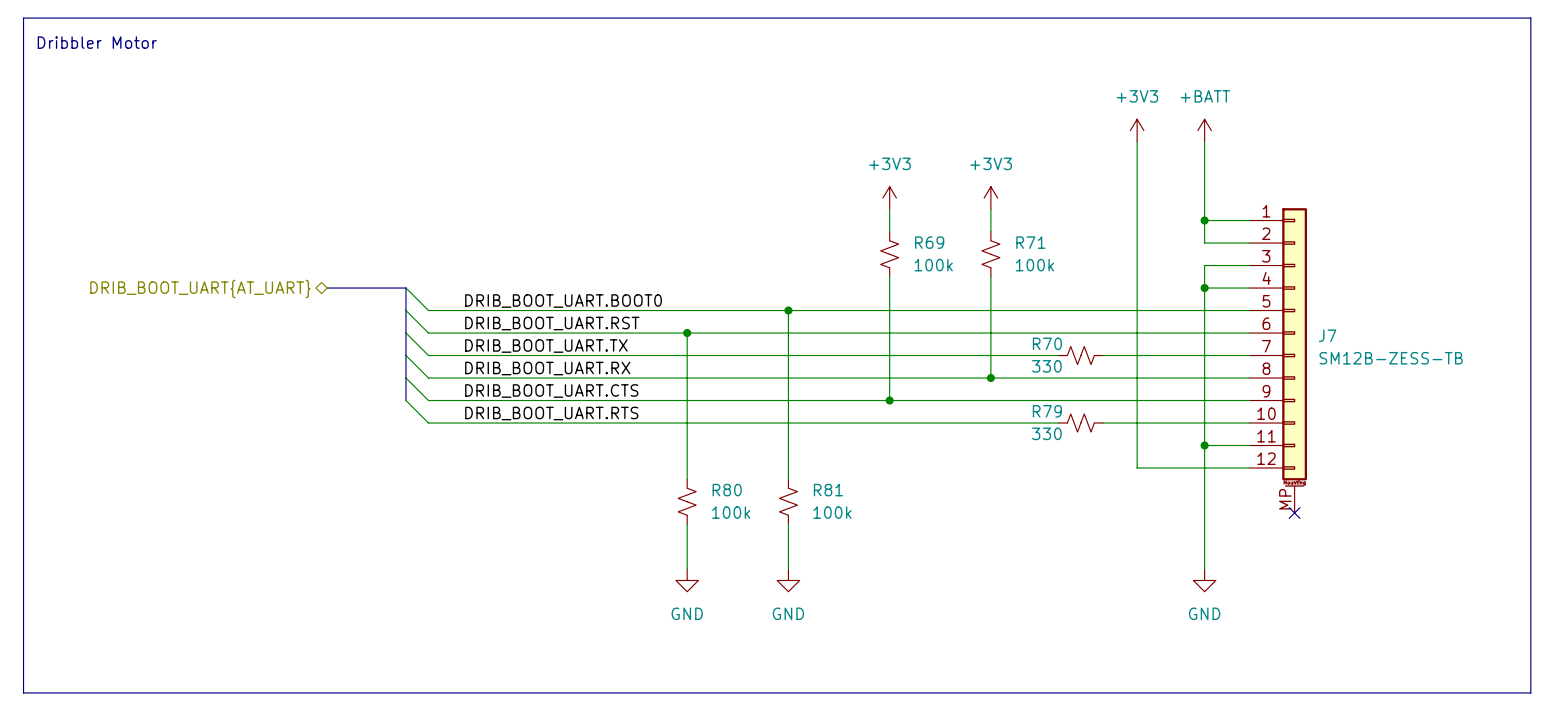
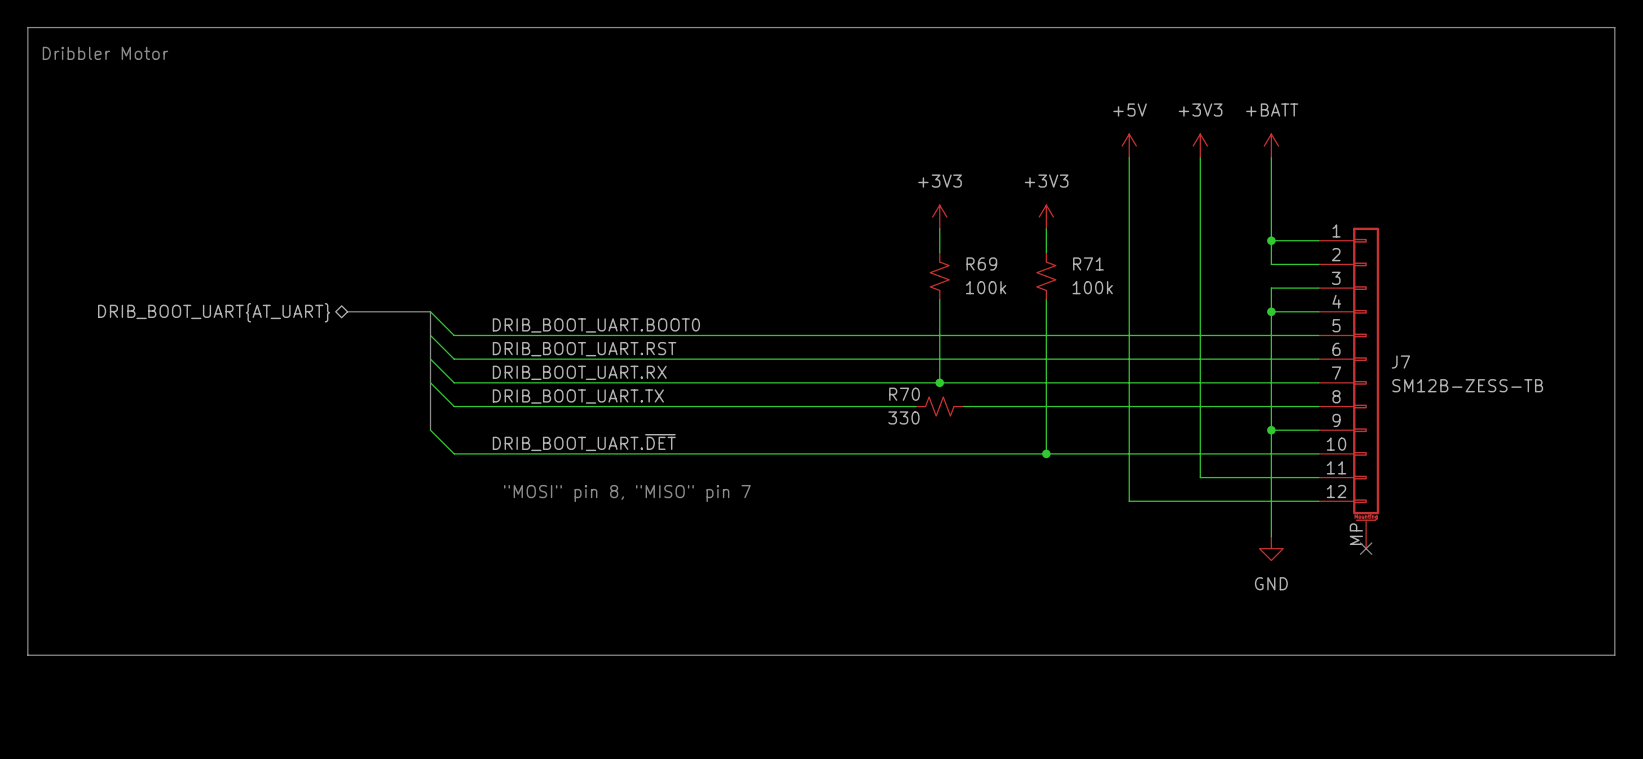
power symbol: none -> +5V (1129, 145)
wire: none -> (1129, 157) (1129, 501) (1200, 501)
wire: (788, 310) (788, 479) -> none
junction: (788, 310) -> none
wire: (687, 333) (687, 479) -> none
junction: (687, 333) -> none
label: DRIB_BOOT_UART.TX (546, 346) -> DRIB_BOOT_UART.RX (579, 372)
wire: (889, 355) (889, 400) -> (1046, 406) (1046, 453)
R70 position: (1080, 355) -> (939, 406)
label: DRIB_BOOT_UART.RX (547, 368) -> DRIB_BOOT_UART.TX (578, 396)
wire: (405, 378) (428, 400) (1204, 400) -> none
junction position: (990, 378) -> (1046, 453)
label: DRIB_BOOT_UART.CTS (551, 391) -> none
junction position: (889, 400) -> (939, 382)
label: DRIB_BOOT_UART.RTS (551, 413) -> DRIB_BOOT_UART.~{DET} (584, 442)
R79: 330 (1080, 423) -> none
wire: (1137, 445) (1137, 468) -> (1200, 477) (1271, 477)
junction position: (1204, 445) -> (1271, 430)
text: none -> "MOSI" pin 8, "MISO" pin 7 (627, 493)
R80: 100k (687, 501) -> none
R81: 100k (788, 501) -> none
wire: (1204, 501) (1204, 569) -> none
wire: (687, 524) (687, 569) -> none
wire: (788, 524) (788, 569) -> none
power symbol: GND (687, 580) -> none
power symbol: GND (788, 580) -> none
power symbol position: GND (1204, 580) -> GND (1271, 548)
line: (23, 614) (23, 692) (1530, 692) (1530, 614) -> (27, 655) (1614, 655)

